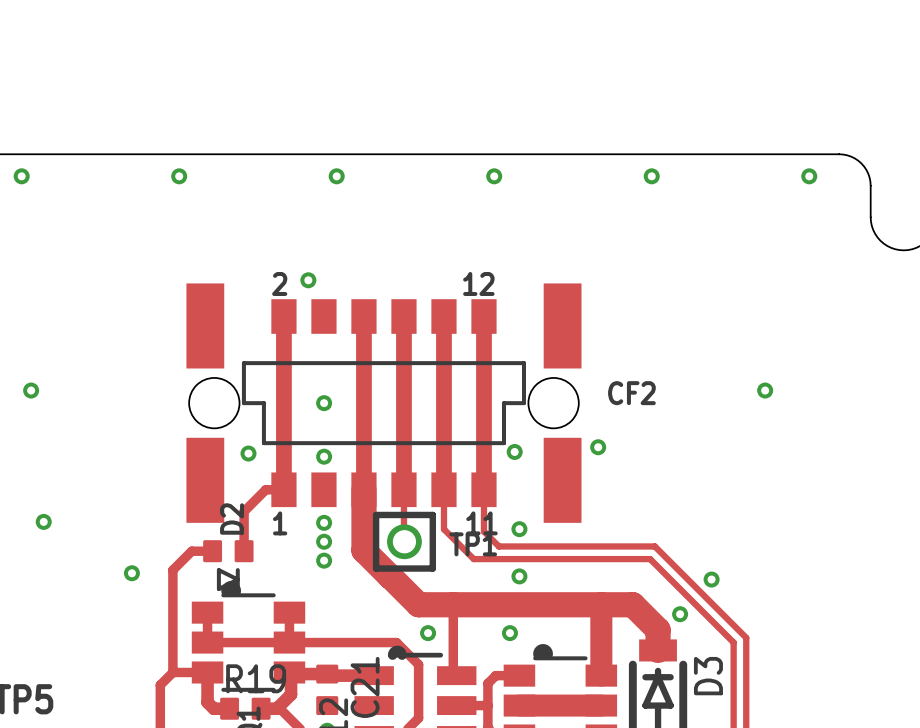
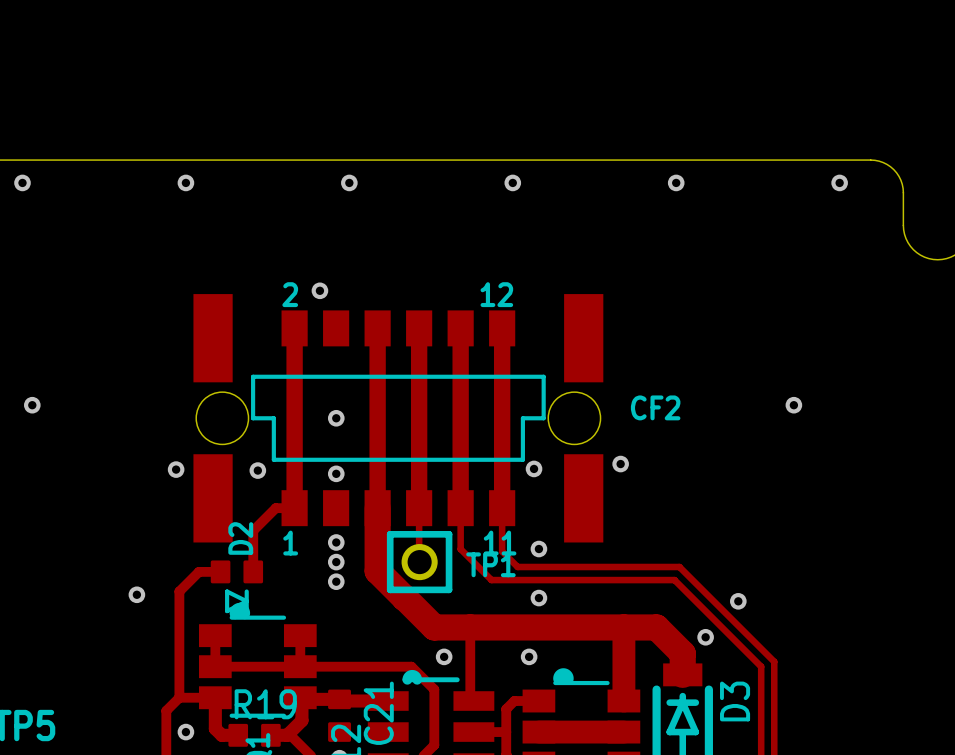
via: none -> (176, 469)
via: (43, 521) -> none
via: none -> (185, 732)

